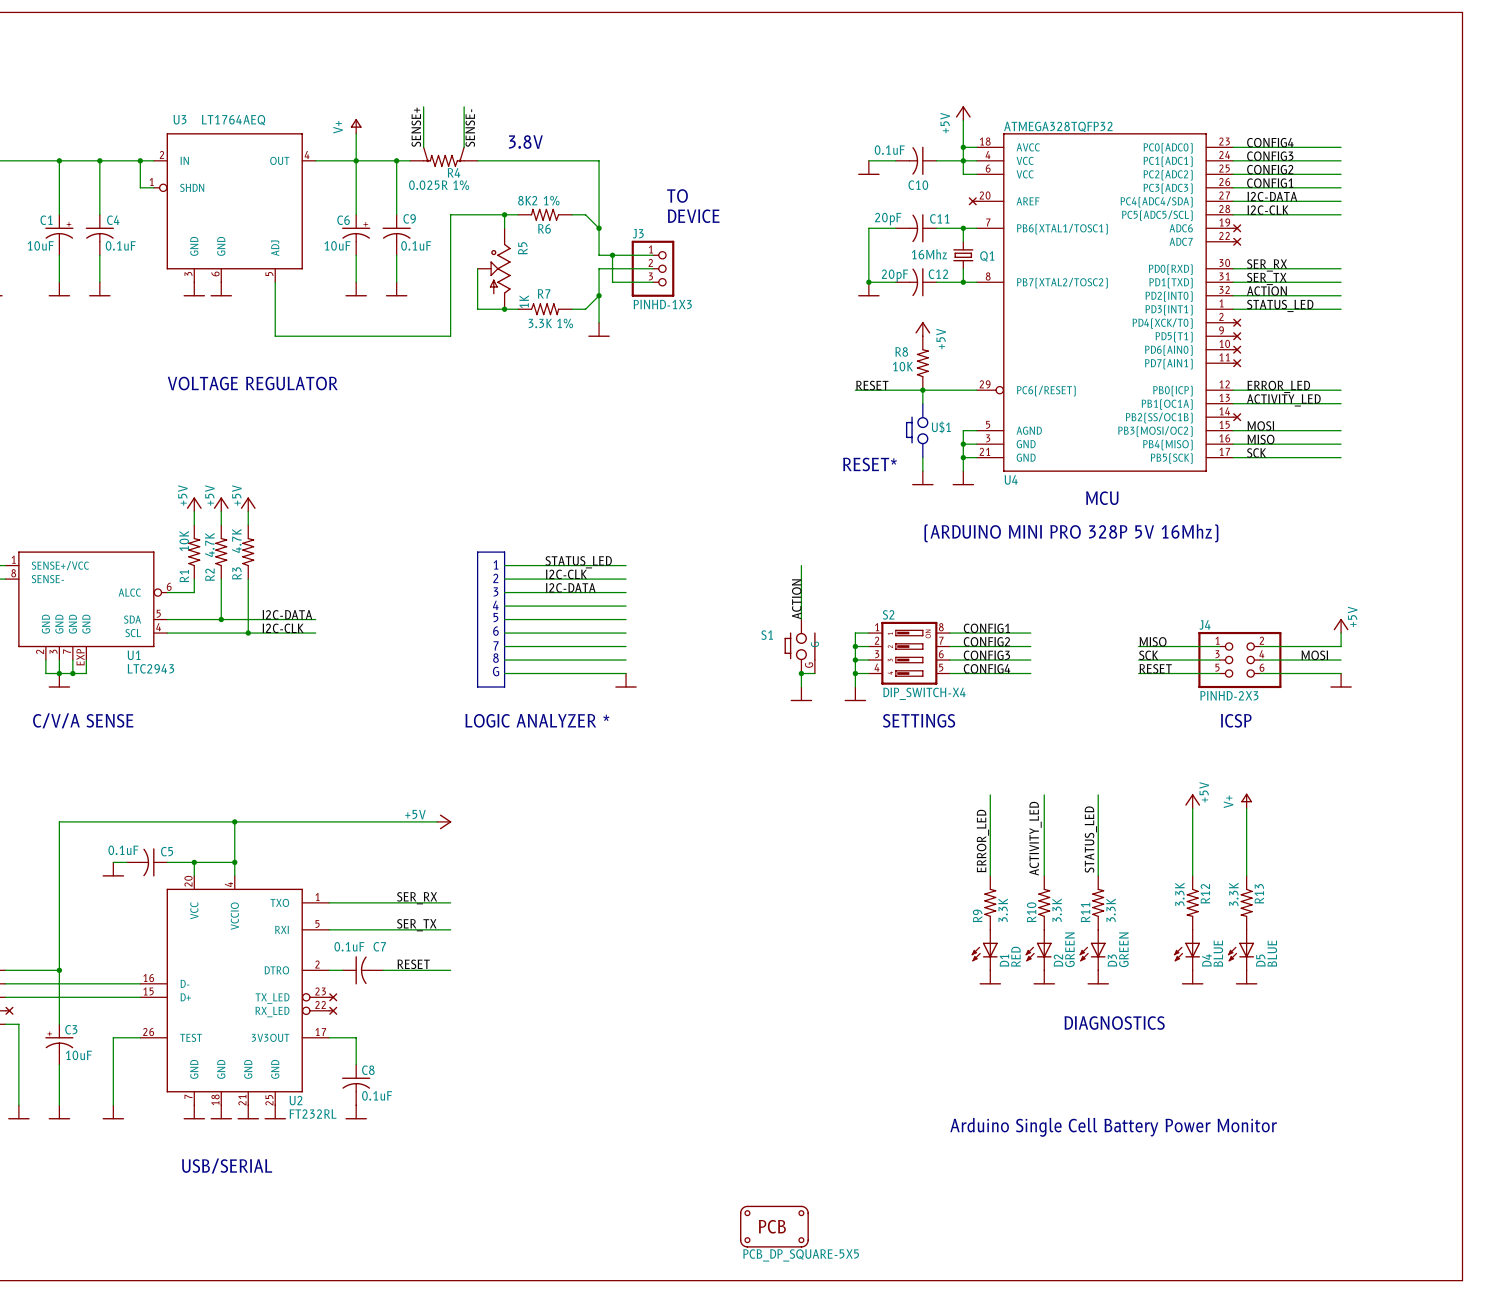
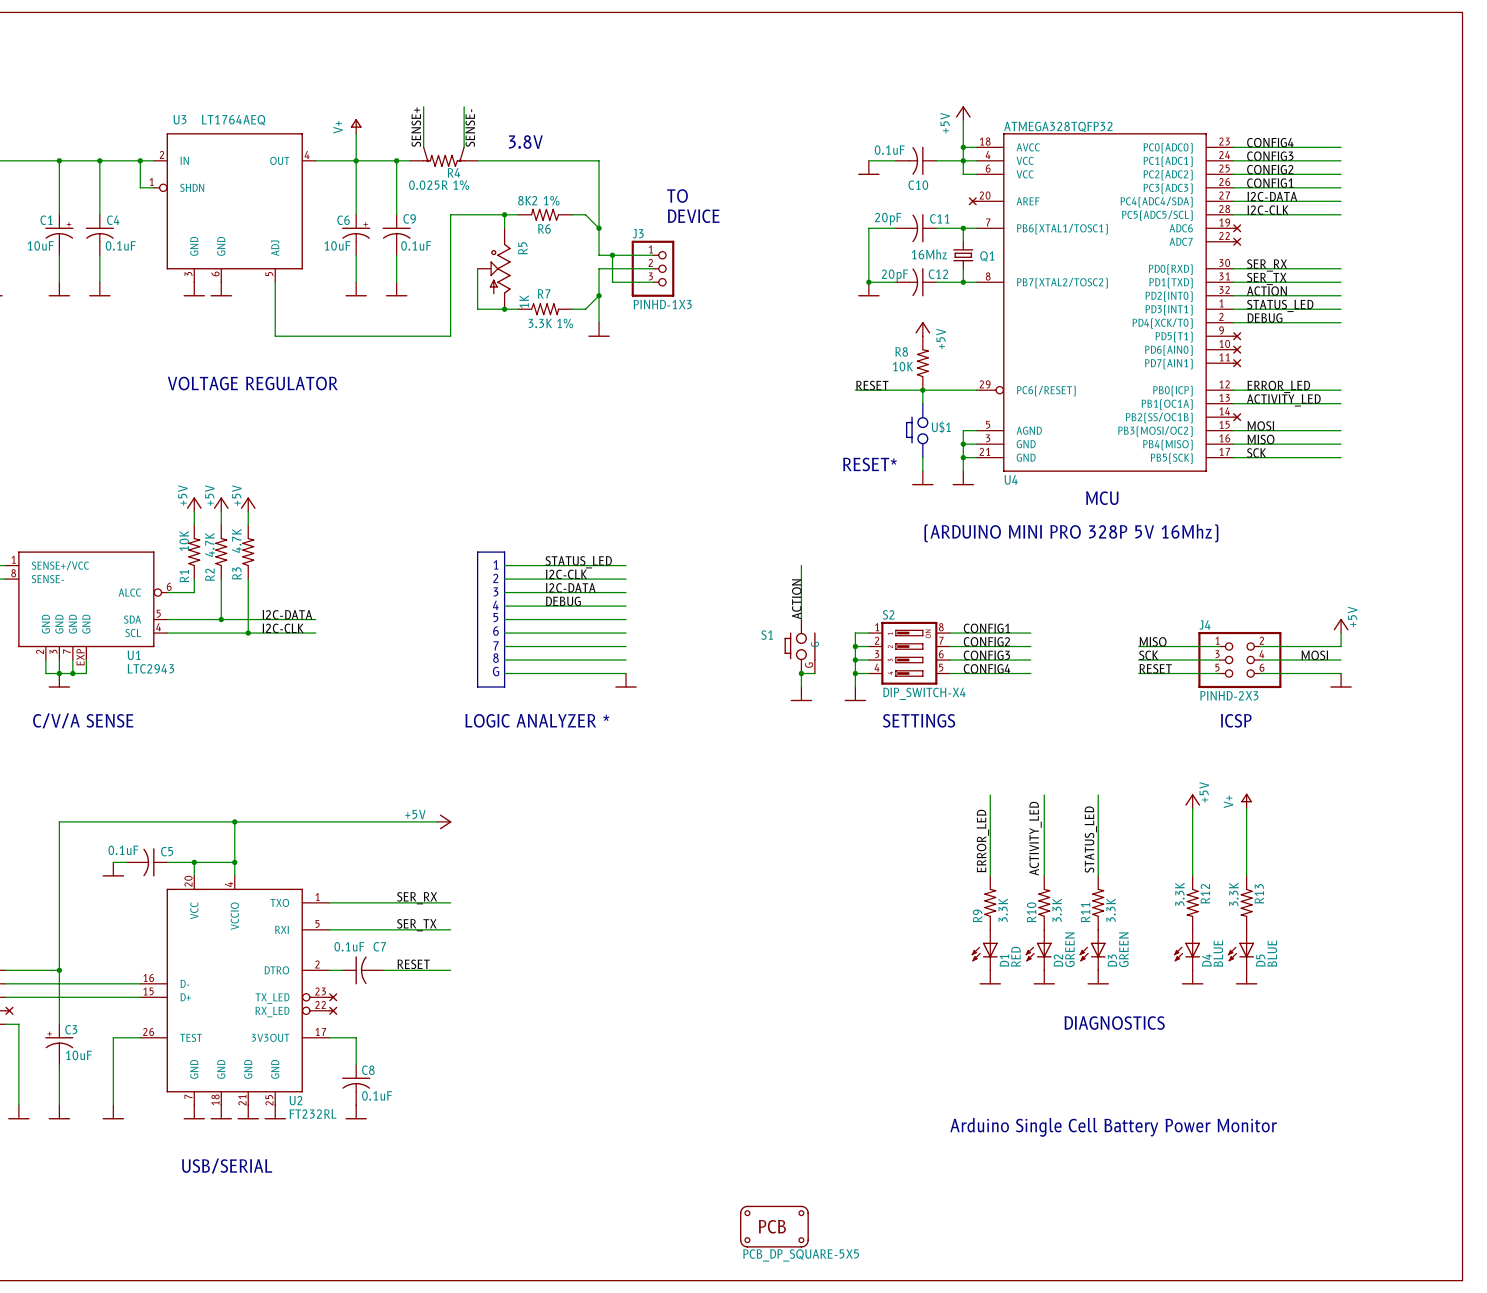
label: none -> DEBUG (1265, 318)
wire: none -> (1233, 322) (1341, 322)
part: (1236, 322) -> none
label: none -> DEBUG (563, 601)

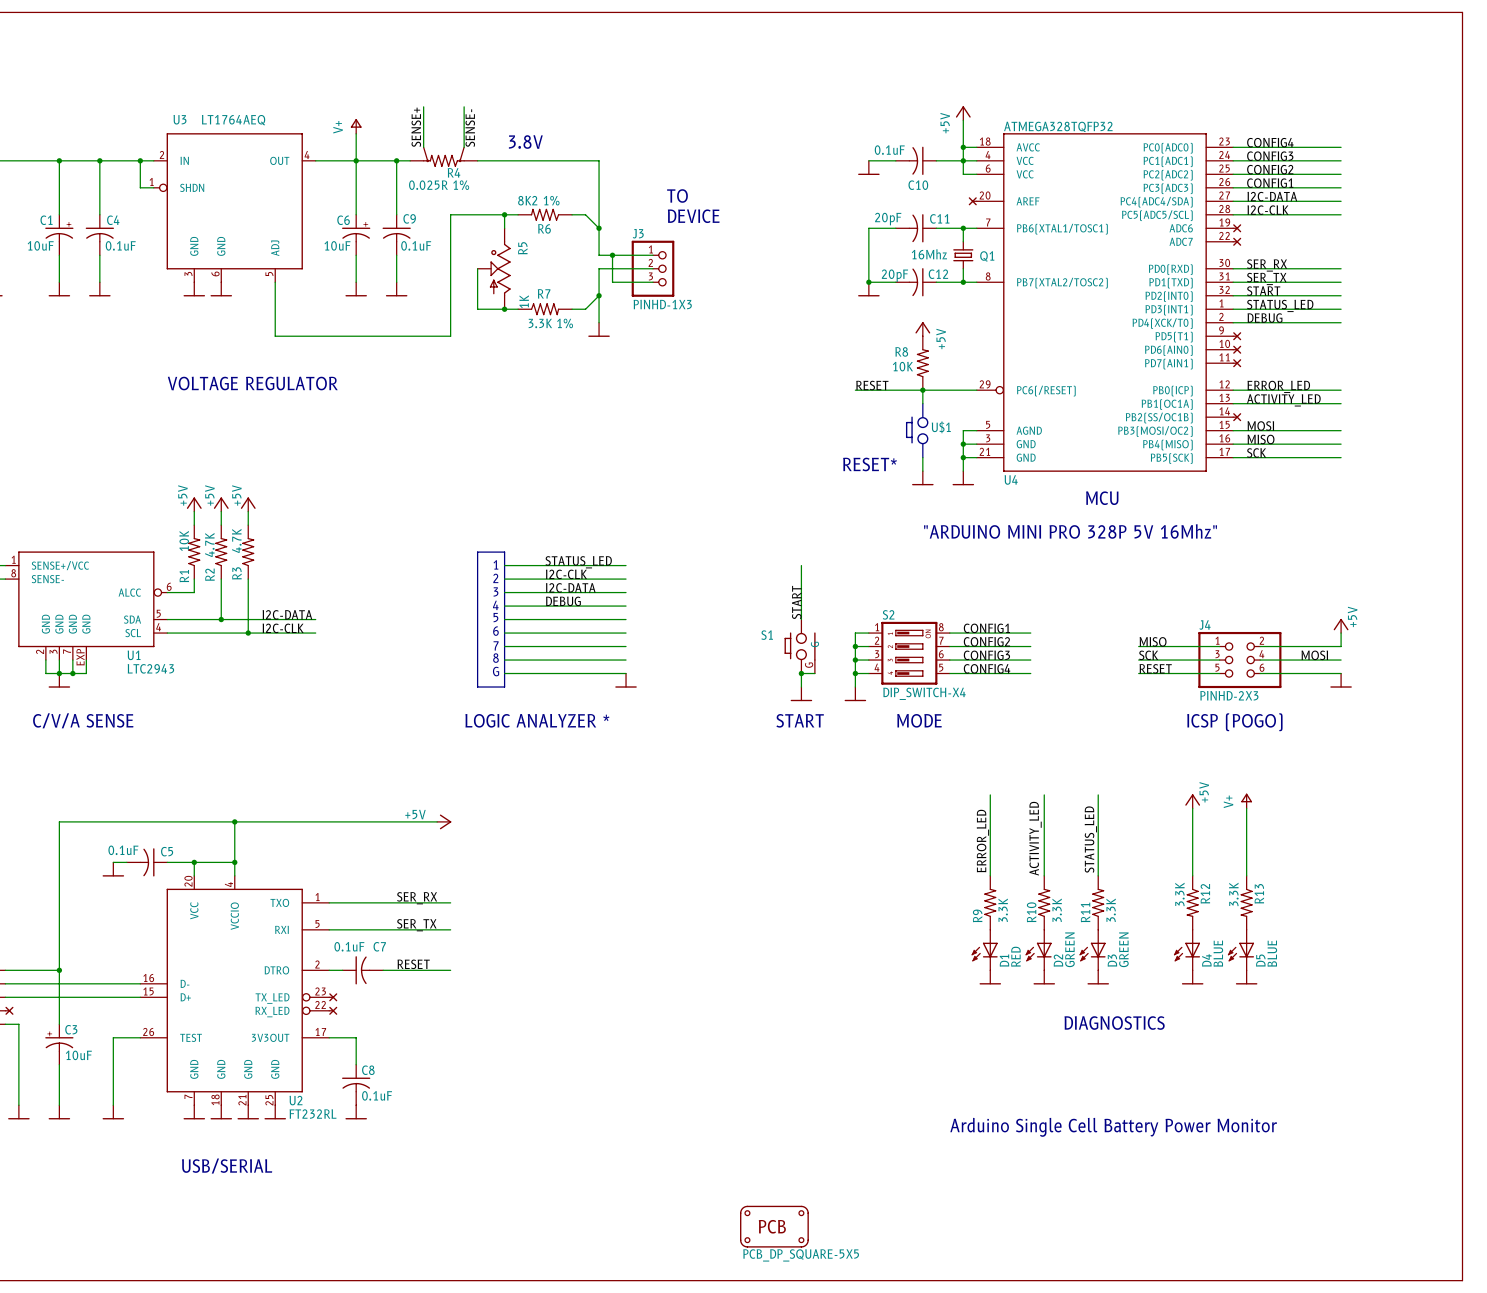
label: ACTION (1266, 291) -> START (1263, 291)
text: (ARDUINO MINI PRO 328P 5V 16Mhz) (1071, 533) -> "ARDUINO MINI PRO 328P 5V 16Mhz" (1070, 531)
label: ACTION (796, 599) -> START (796, 602)
text: none -> START (800, 720)
text: SETTINGS (919, 720) -> none
text: none -> MODE (919, 720)
text: ICSP (1236, 720) -> none
text: none -> ICSP (POGO) (1234, 722)

